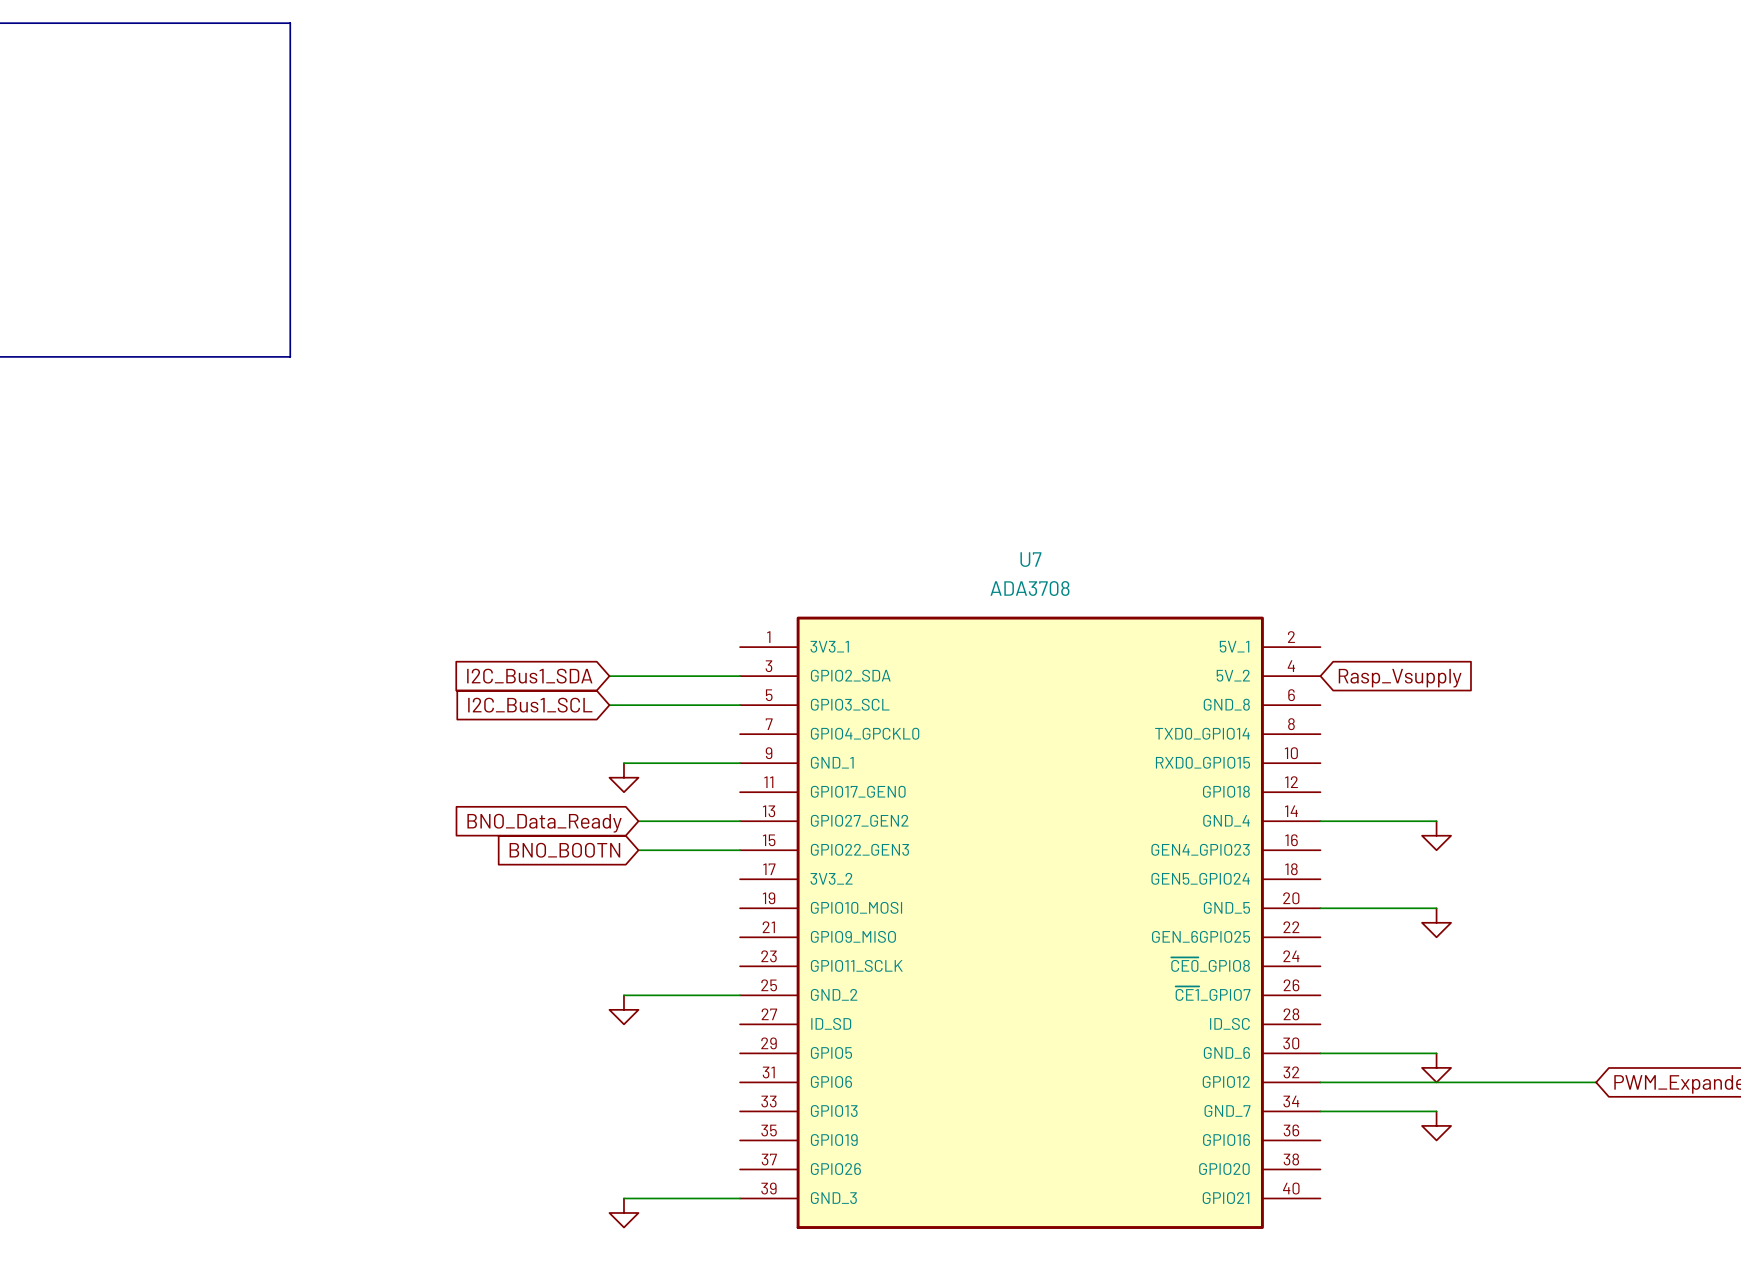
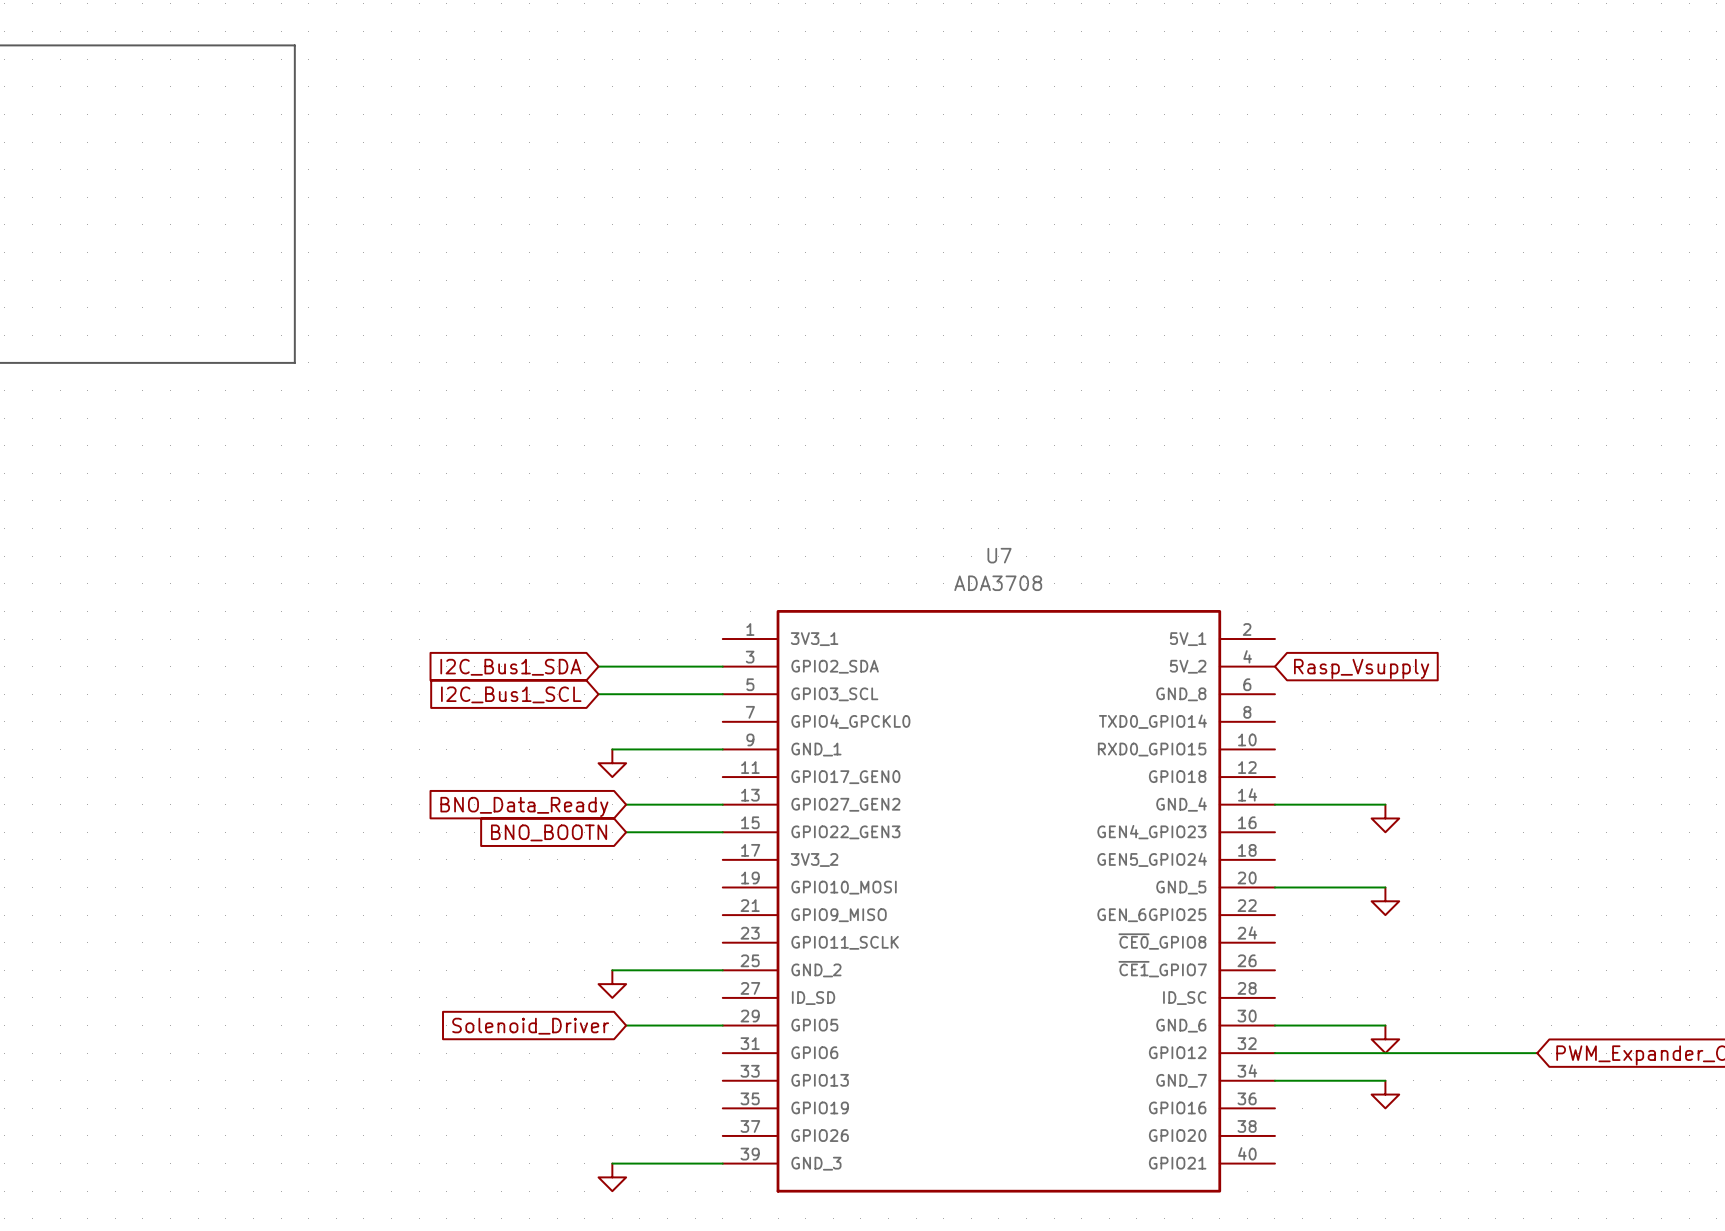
global label: none -> Solenoid_Driver (530, 1026)
wire: none -> (626, 1025) (722, 1025)

